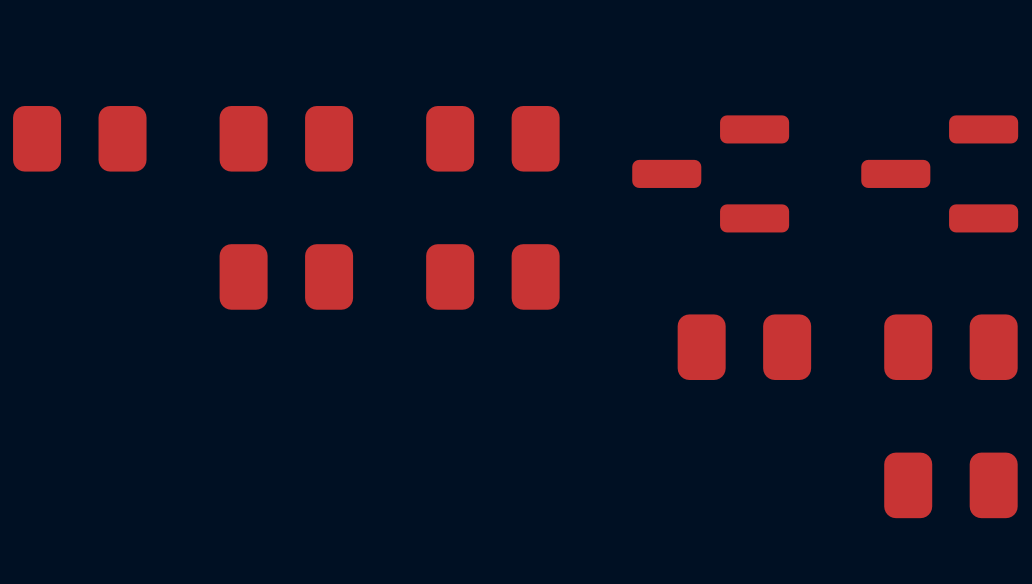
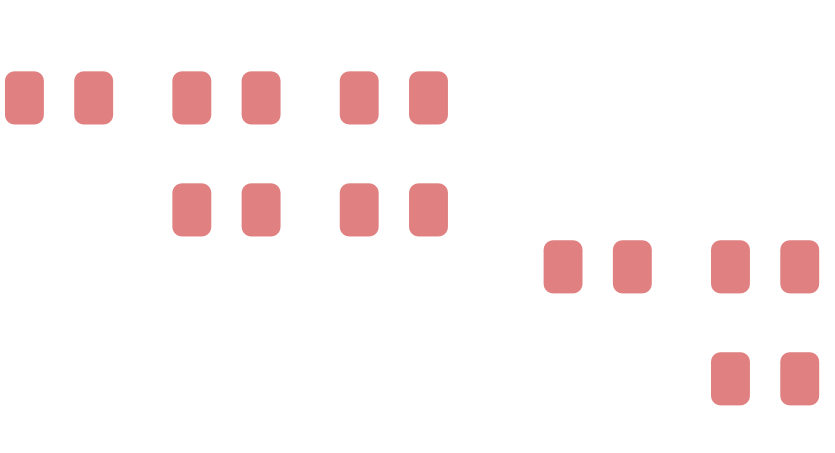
part: (710, 173) -> none
part: (939, 173) -> none

